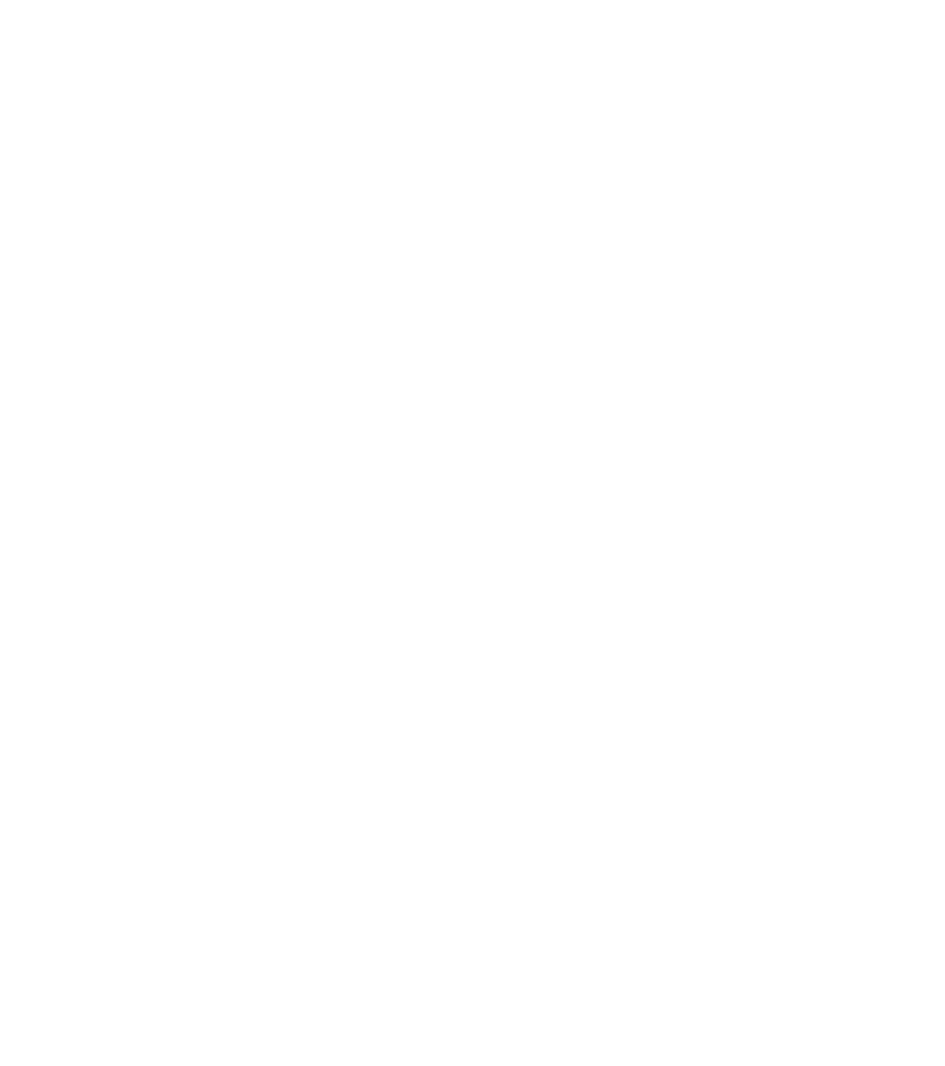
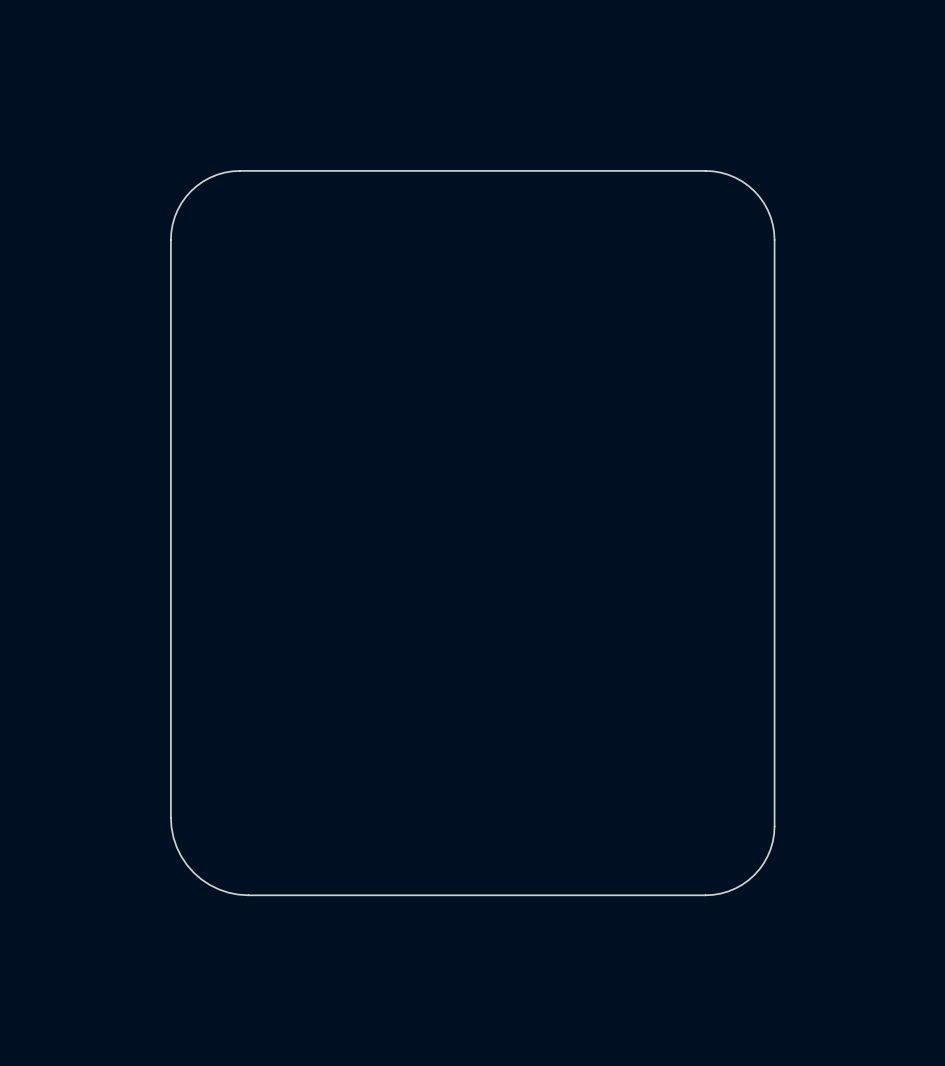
board edge: none -> (705, 170) (239, 170) (224, 172) (209, 177) (196, 185) (185, 196) (174, 217) (170, 239) (170, 817) (176, 847) (186, 864) (201, 879) (218, 889) (248, 895) (705, 895) (720, 893) (735, 888) (748, 880) (759, 869) (770, 849) (774, 826) (774, 232) (770, 217) (763, 203) (748, 185) (728, 174) (705, 170)

